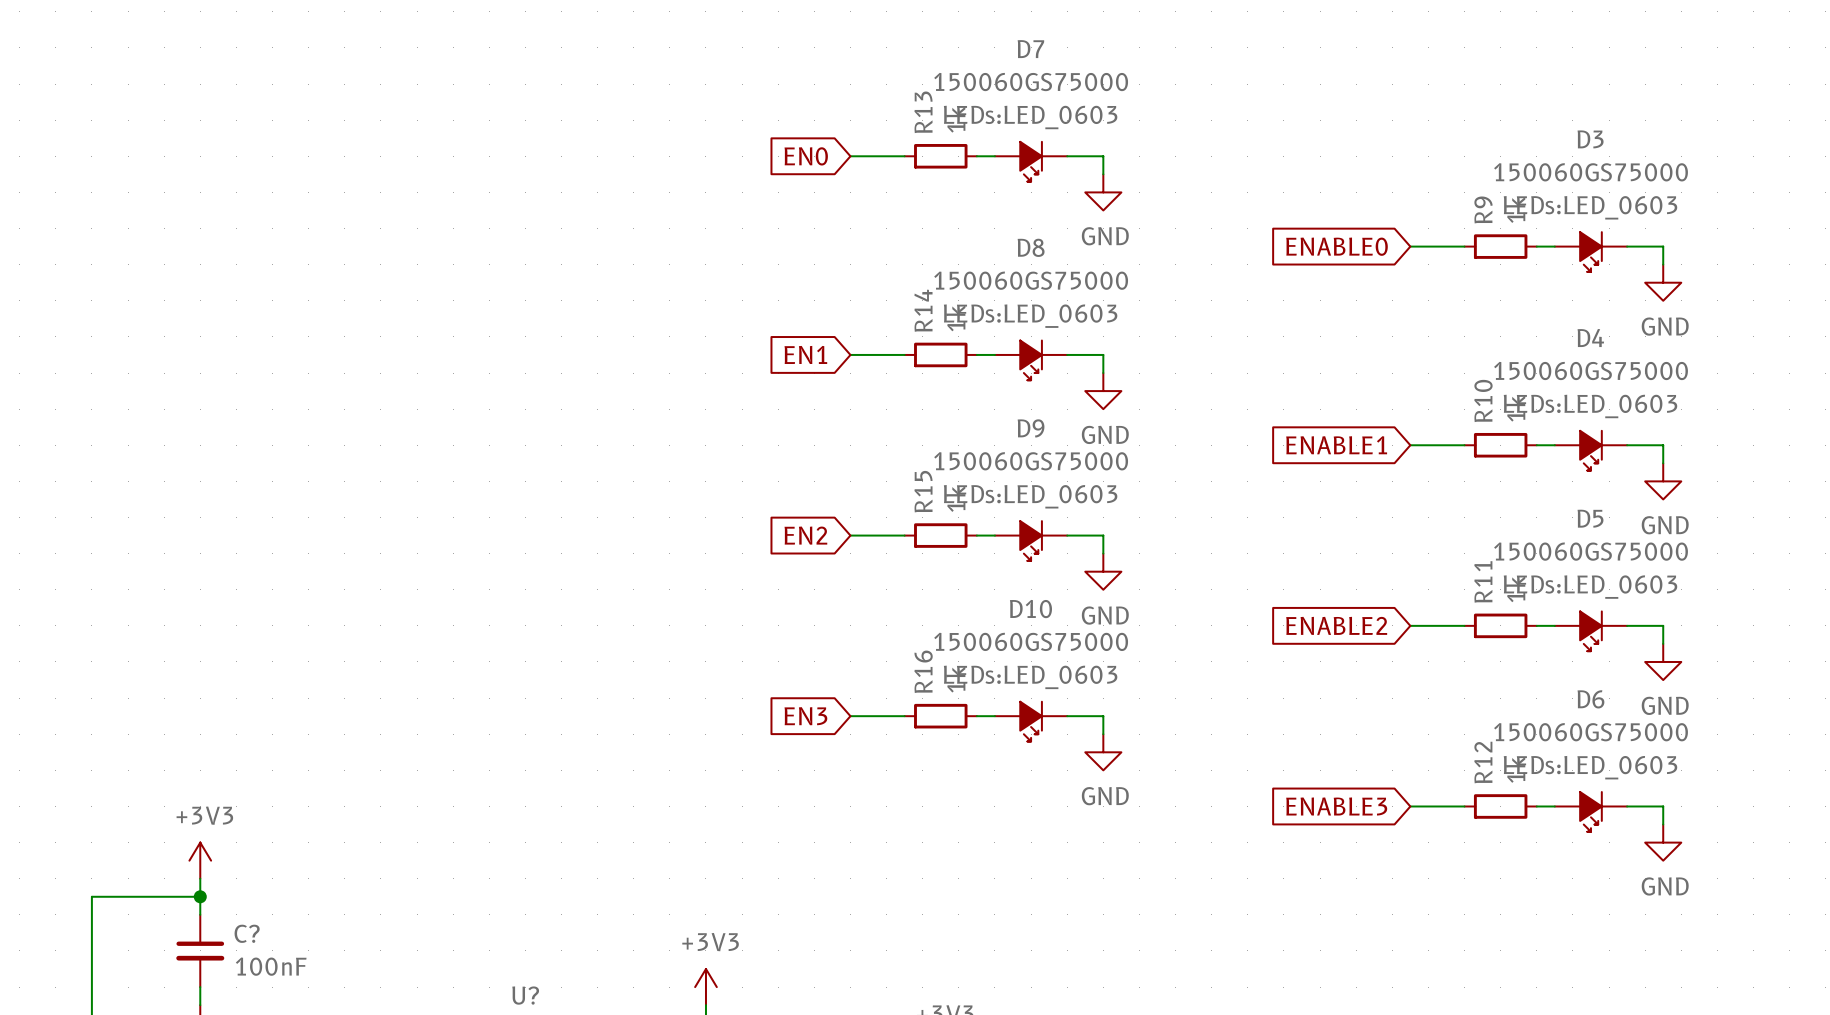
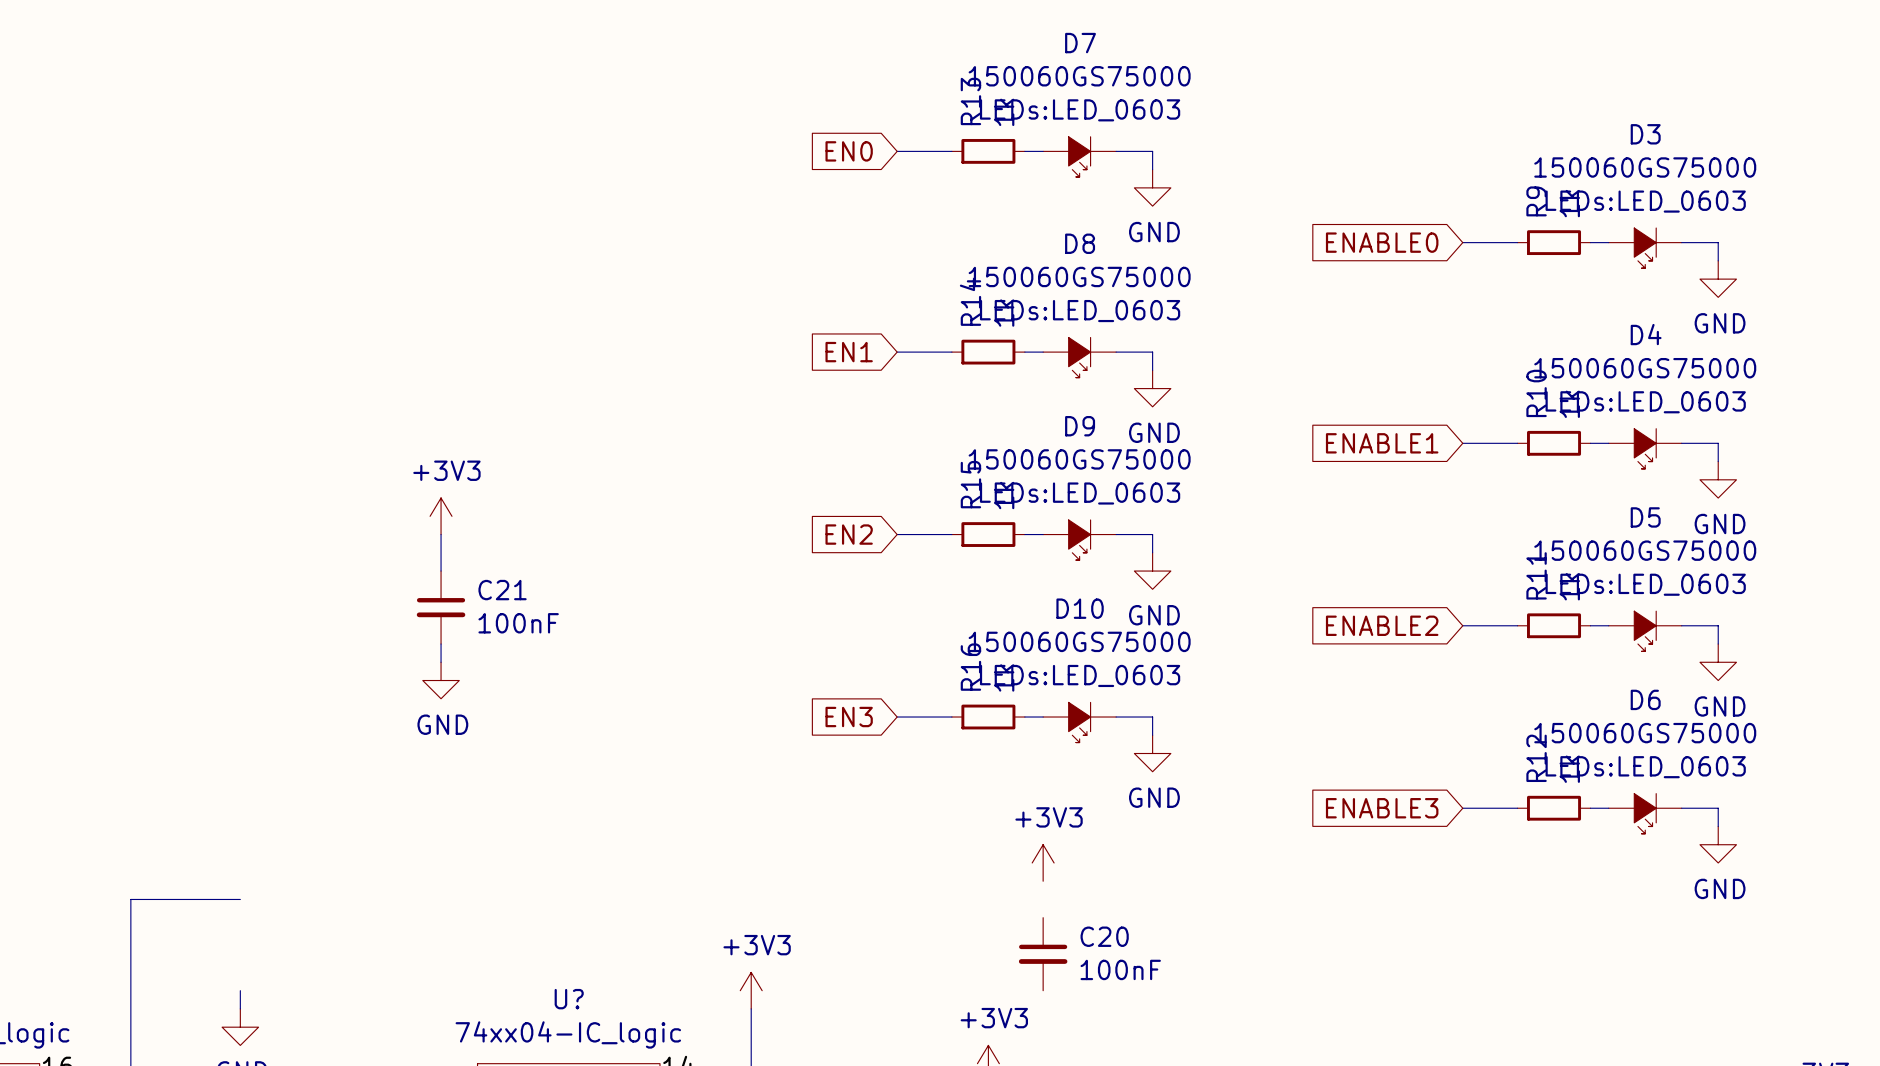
power symbol: none -> +3V3 (441, 516)
wire: none -> (441, 534) (441, 571)
C21: none -> 100nF (441, 607)
wire: none -> (441, 644) (441, 662)
power symbol: none -> GND (441, 680)
power symbol: +3V3 (200, 860) -> none
power symbol: none -> +3V3 (1043, 862)
wire: (200, 878) (200, 914) -> none
junction: (200, 896) -> none
C?: 100nF (200, 950) -> none
C20: none -> 100nF (1043, 954)

